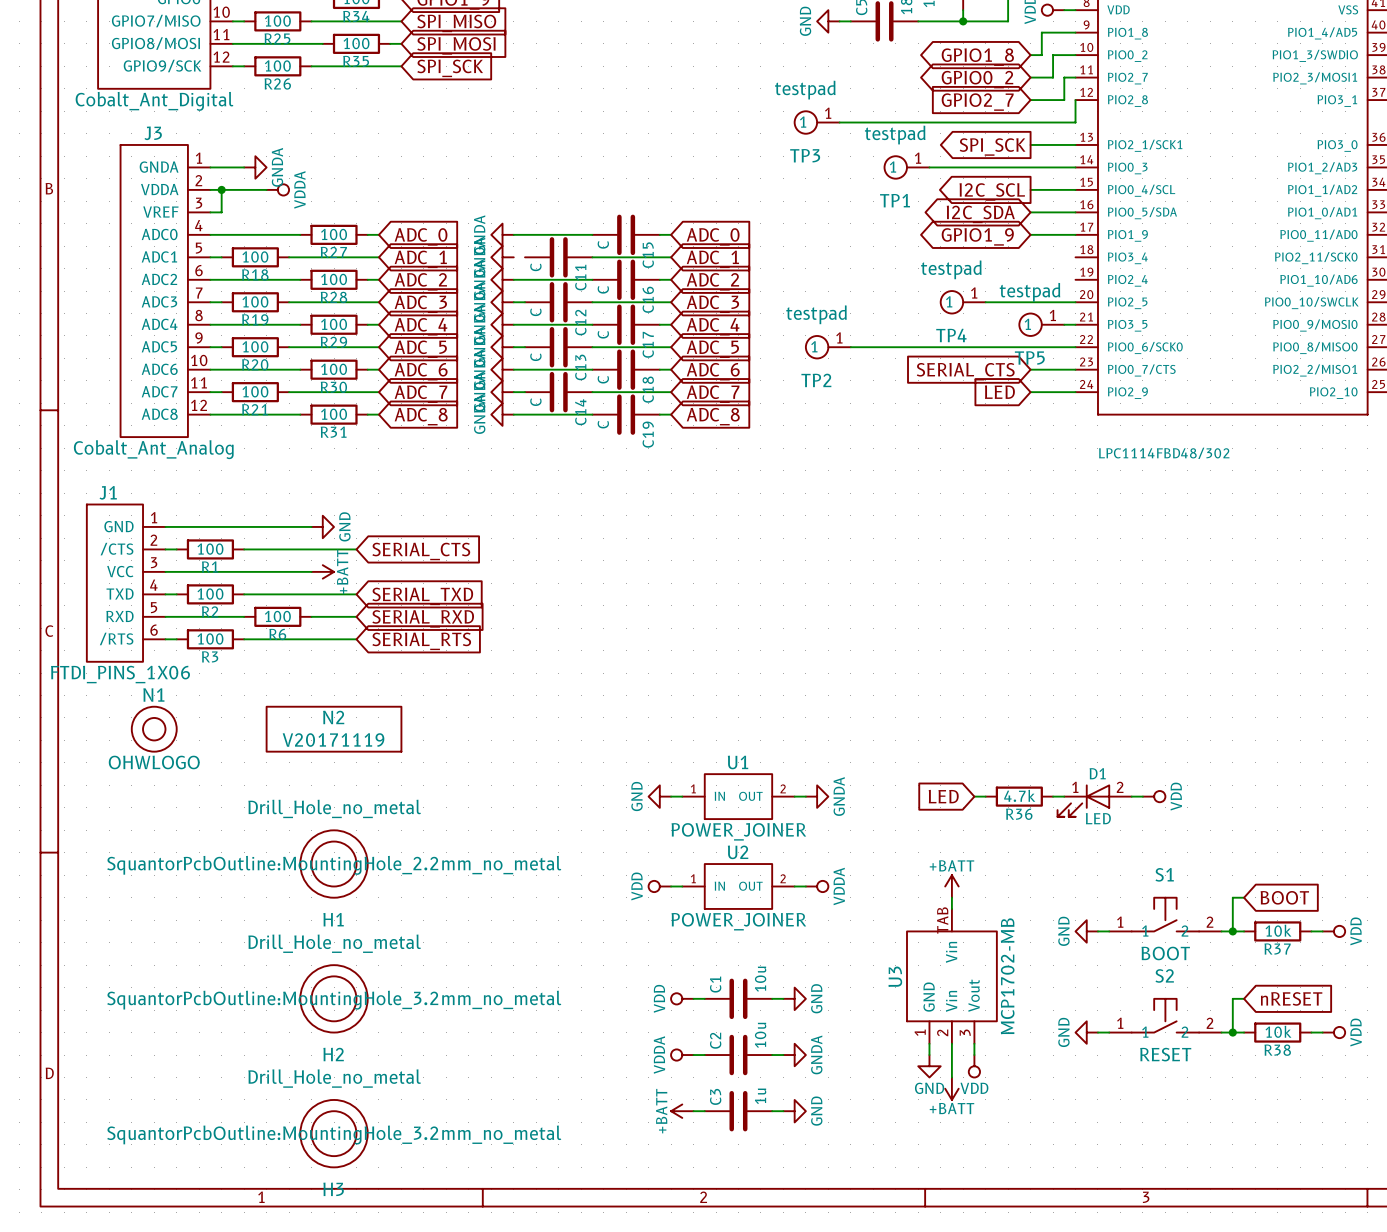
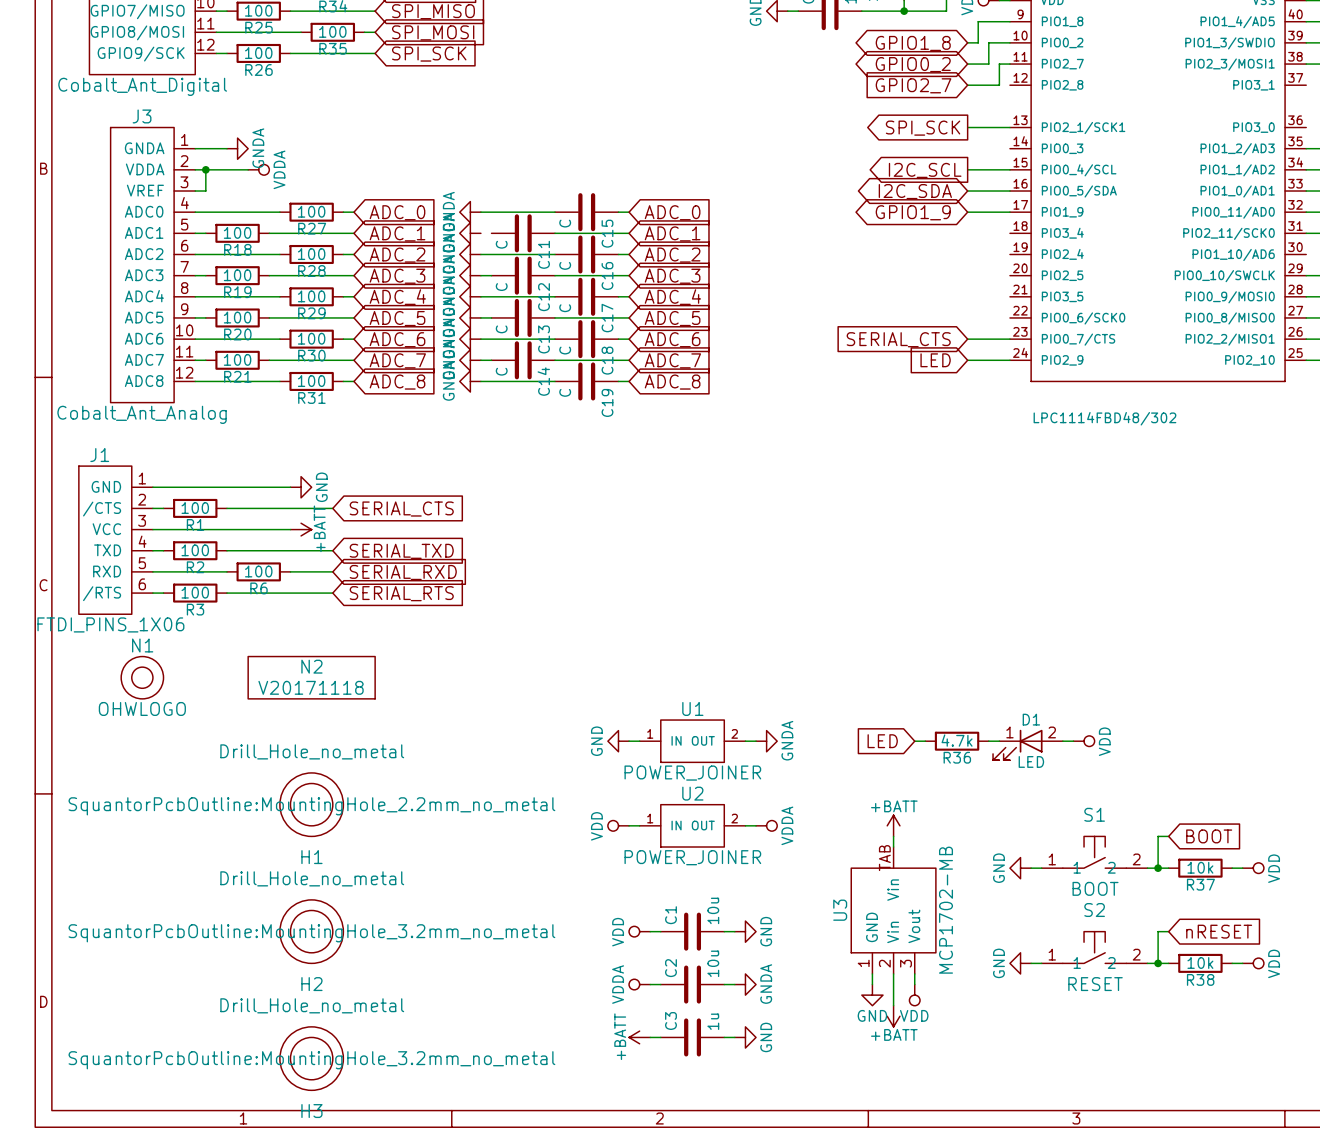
wire: (1075, 100) (1075, 122) (839, 122) -> none
TP3: testpad (817, 122) -> none
TP1: testpad (906, 167) -> none
wire: (929, 167) (1075, 167) -> none
TP4: testpad (963, 302) -> none
wire: (985, 302) (1075, 302) -> none
TP5: testpad (1041, 324) -> none
wire: (1064, 324) (1075, 324) -> none
TP2: testpad (828, 347) -> none
wire: (850, 347) (1075, 347) -> none
N2 value: V20171119 (333, 740) -> V20171118 (311, 687)

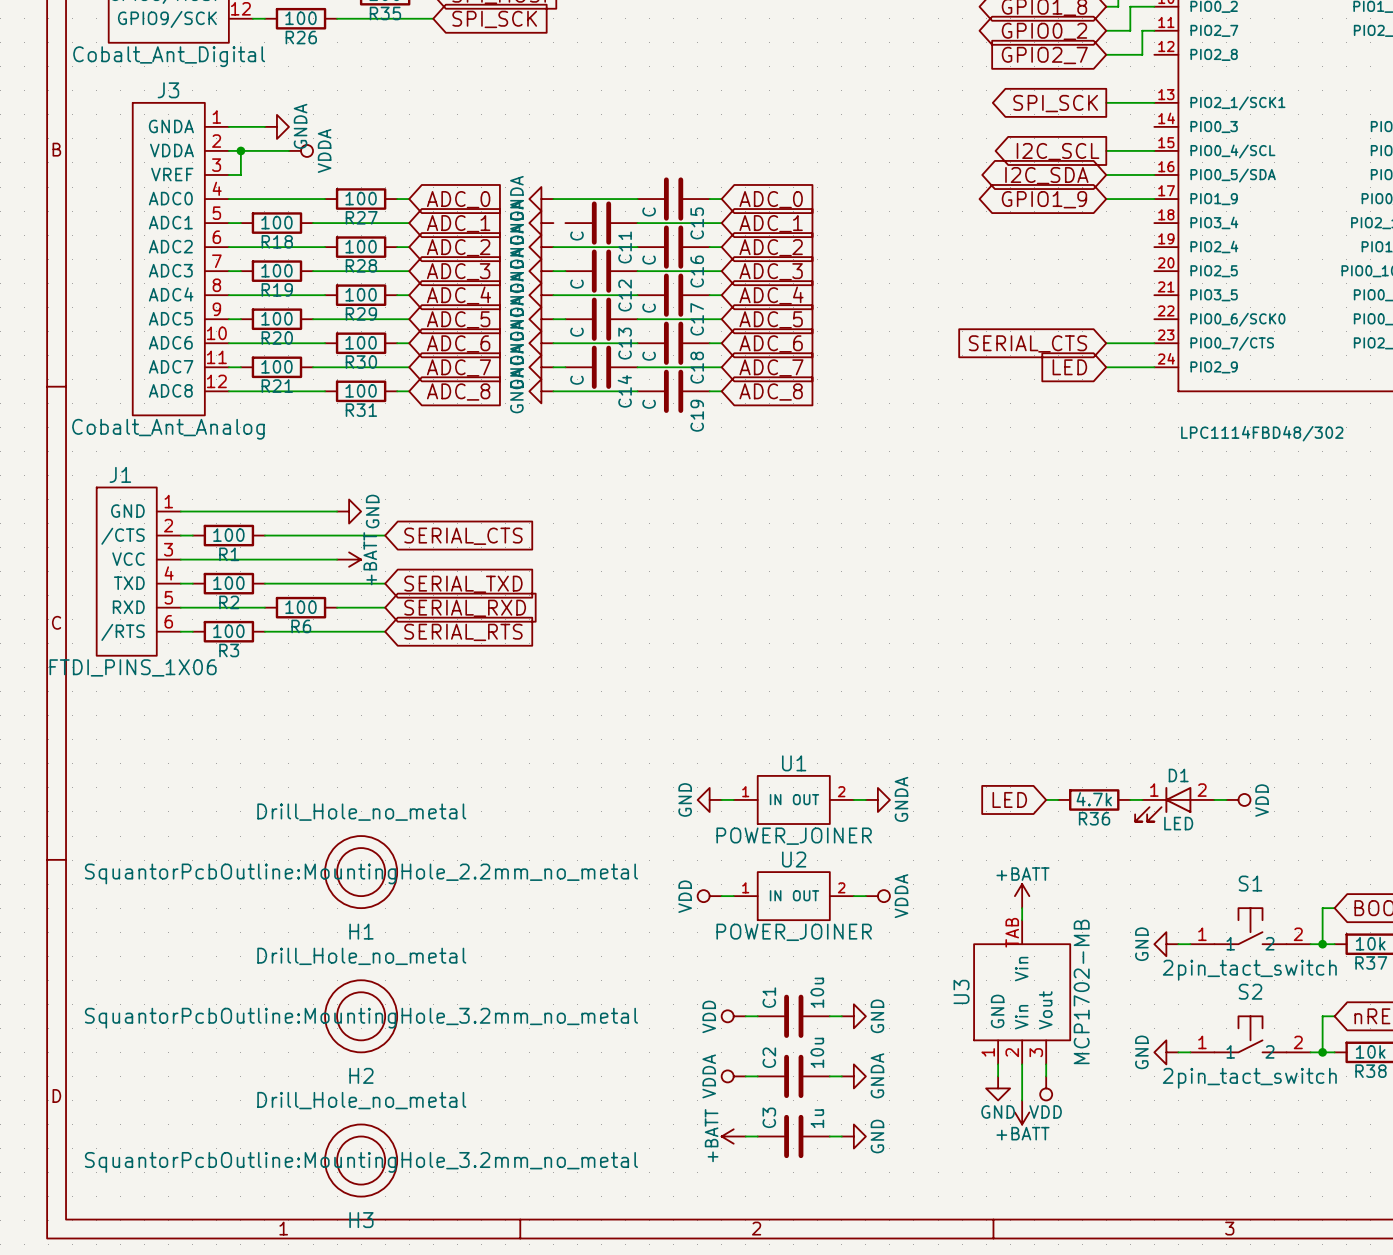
N1: OHWLOGO (142, 677) -> none
N2: V20171118 (311, 677) -> none
S1 value: BOOT (1095, 888) -> 2pin_tact_switch (1249, 970)
S2 value: RESET (1095, 984) -> 2pin_tact_switch (1249, 1078)

